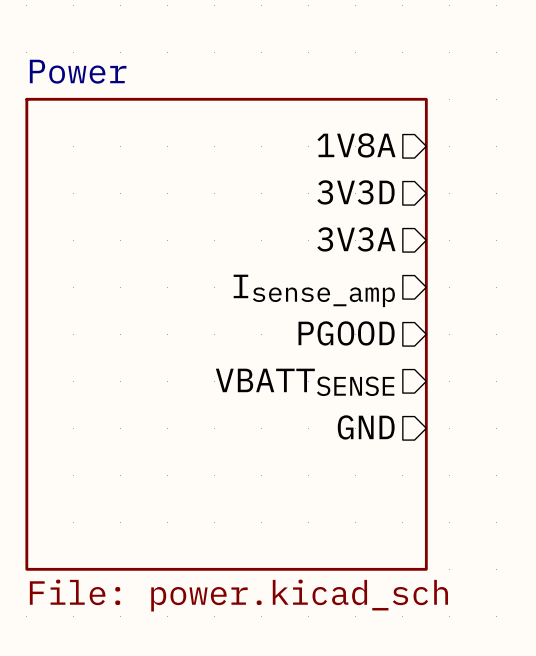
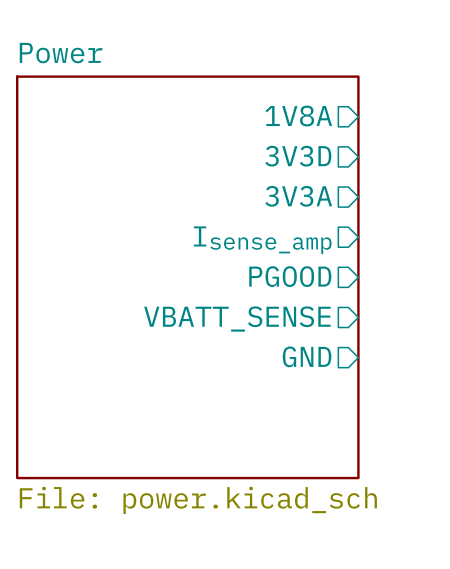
sheet pin: VBATTSENSE (305, 382) -> VBATT_SENSE (237, 318)

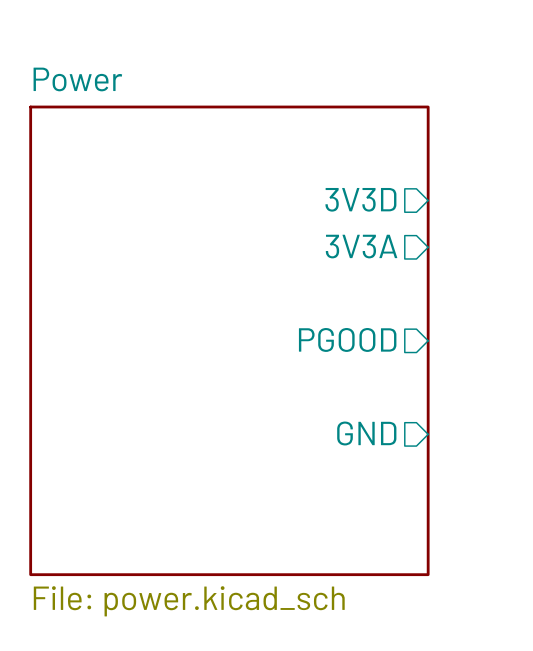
sheet pin: 1V8A (298, 116) -> none
sheet pin: Isense_amp (262, 240) -> none
sheet pin: VBATT_SENSE (237, 318) -> none

